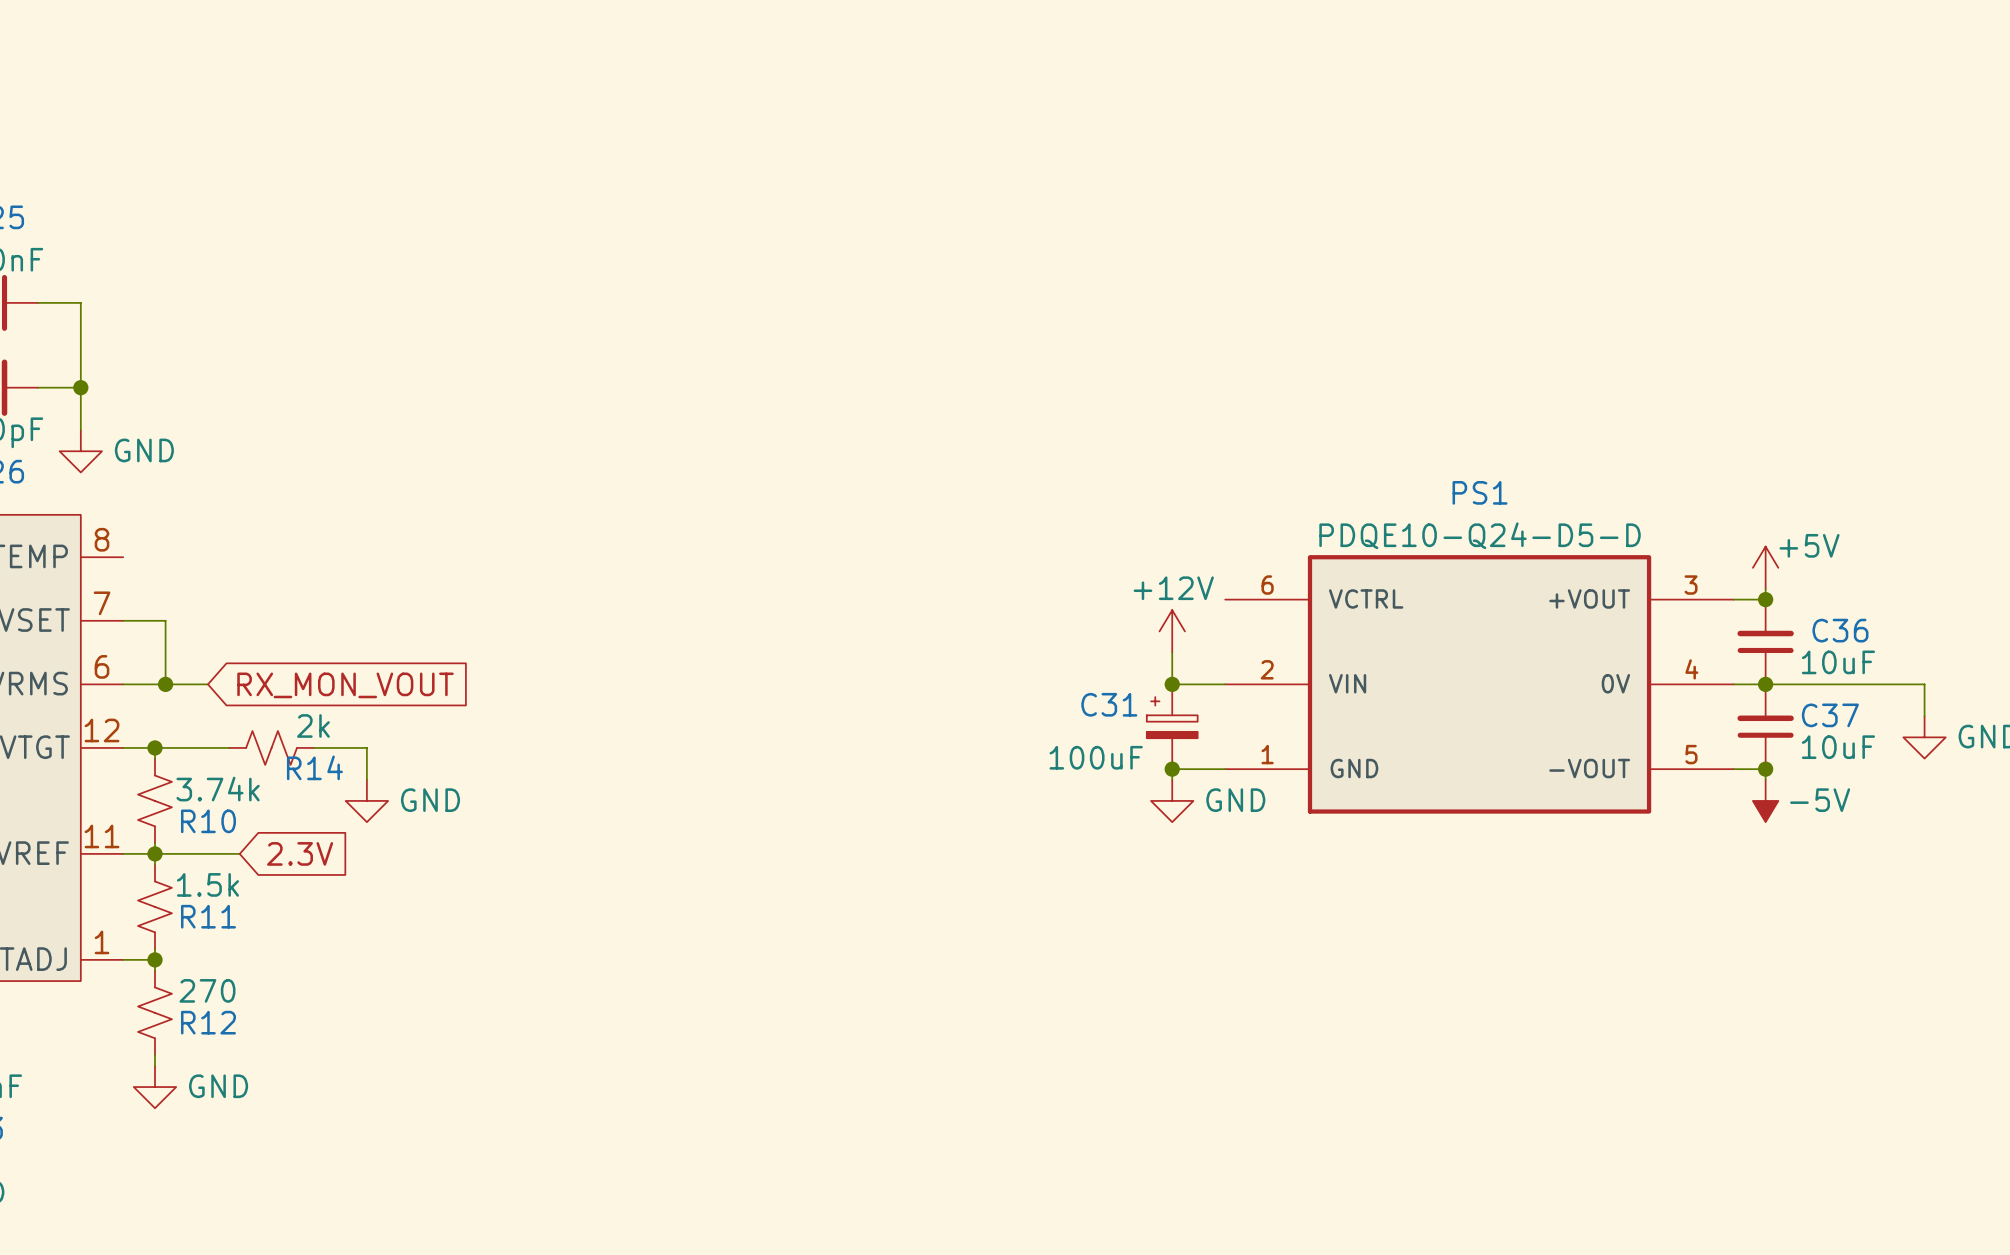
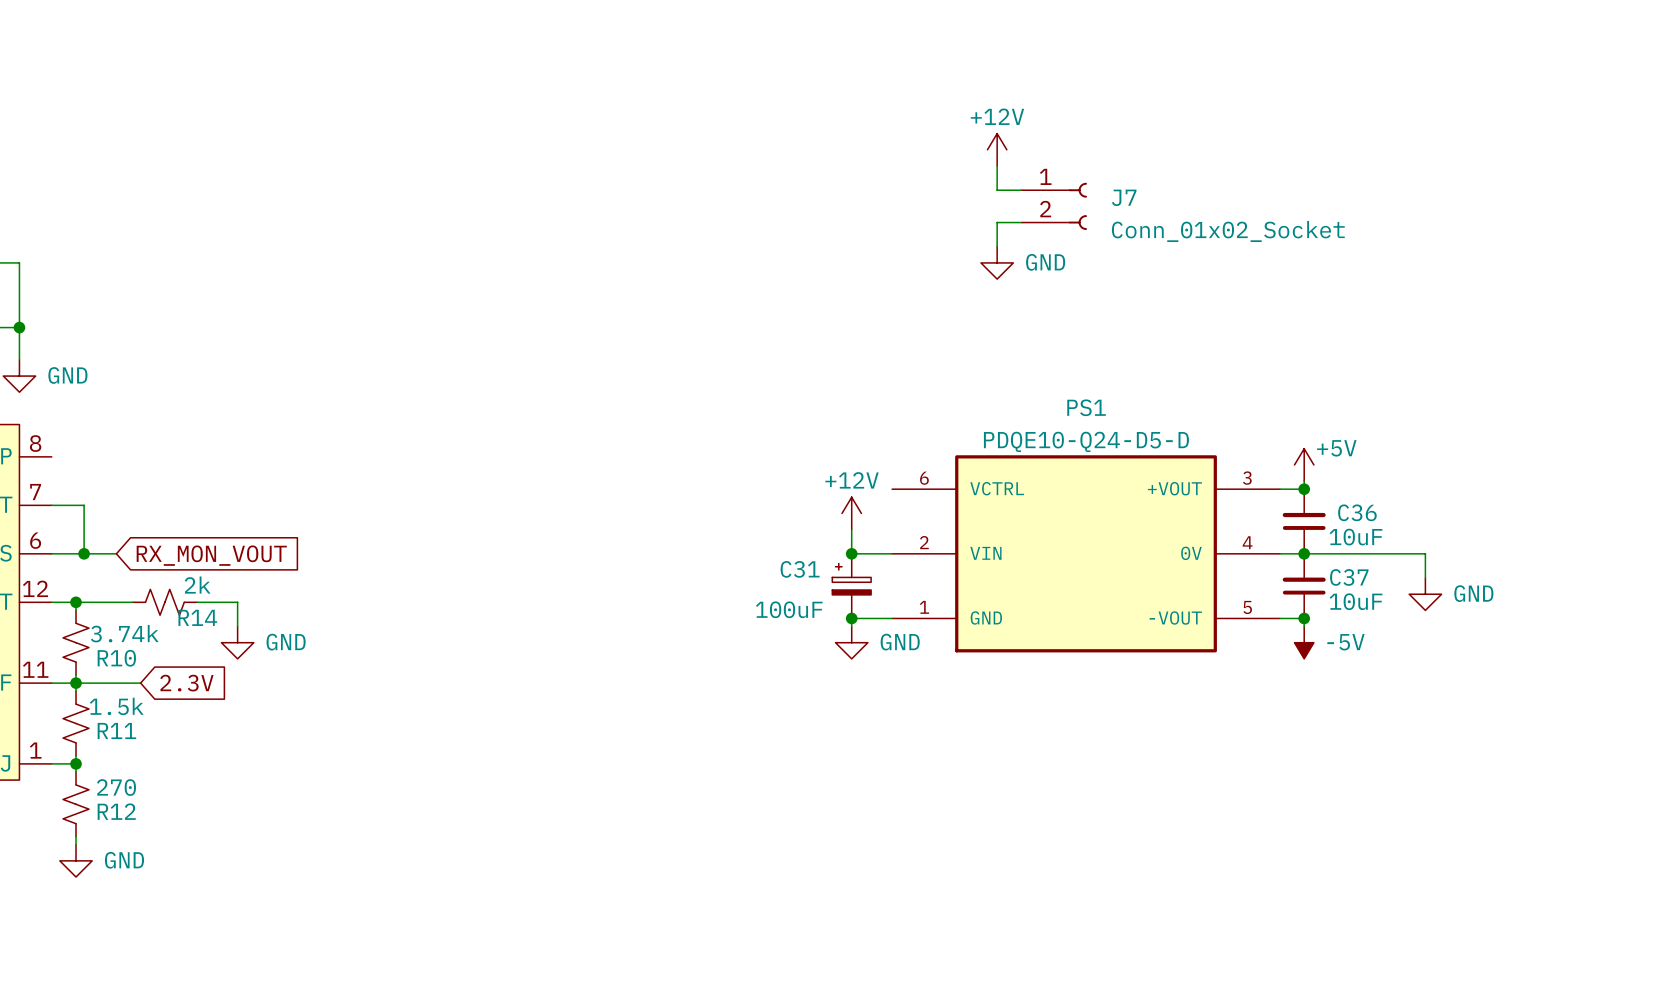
power symbol: none -> +12V (997, 149)
wire: none -> (997, 165) (997, 190) (1021, 190)
J7: none -> Conn_01x02_Socket (1054, 206)
wire: none -> (1021, 222) (997, 222) (997, 246)
power symbol: none -> GND (997, 262)

